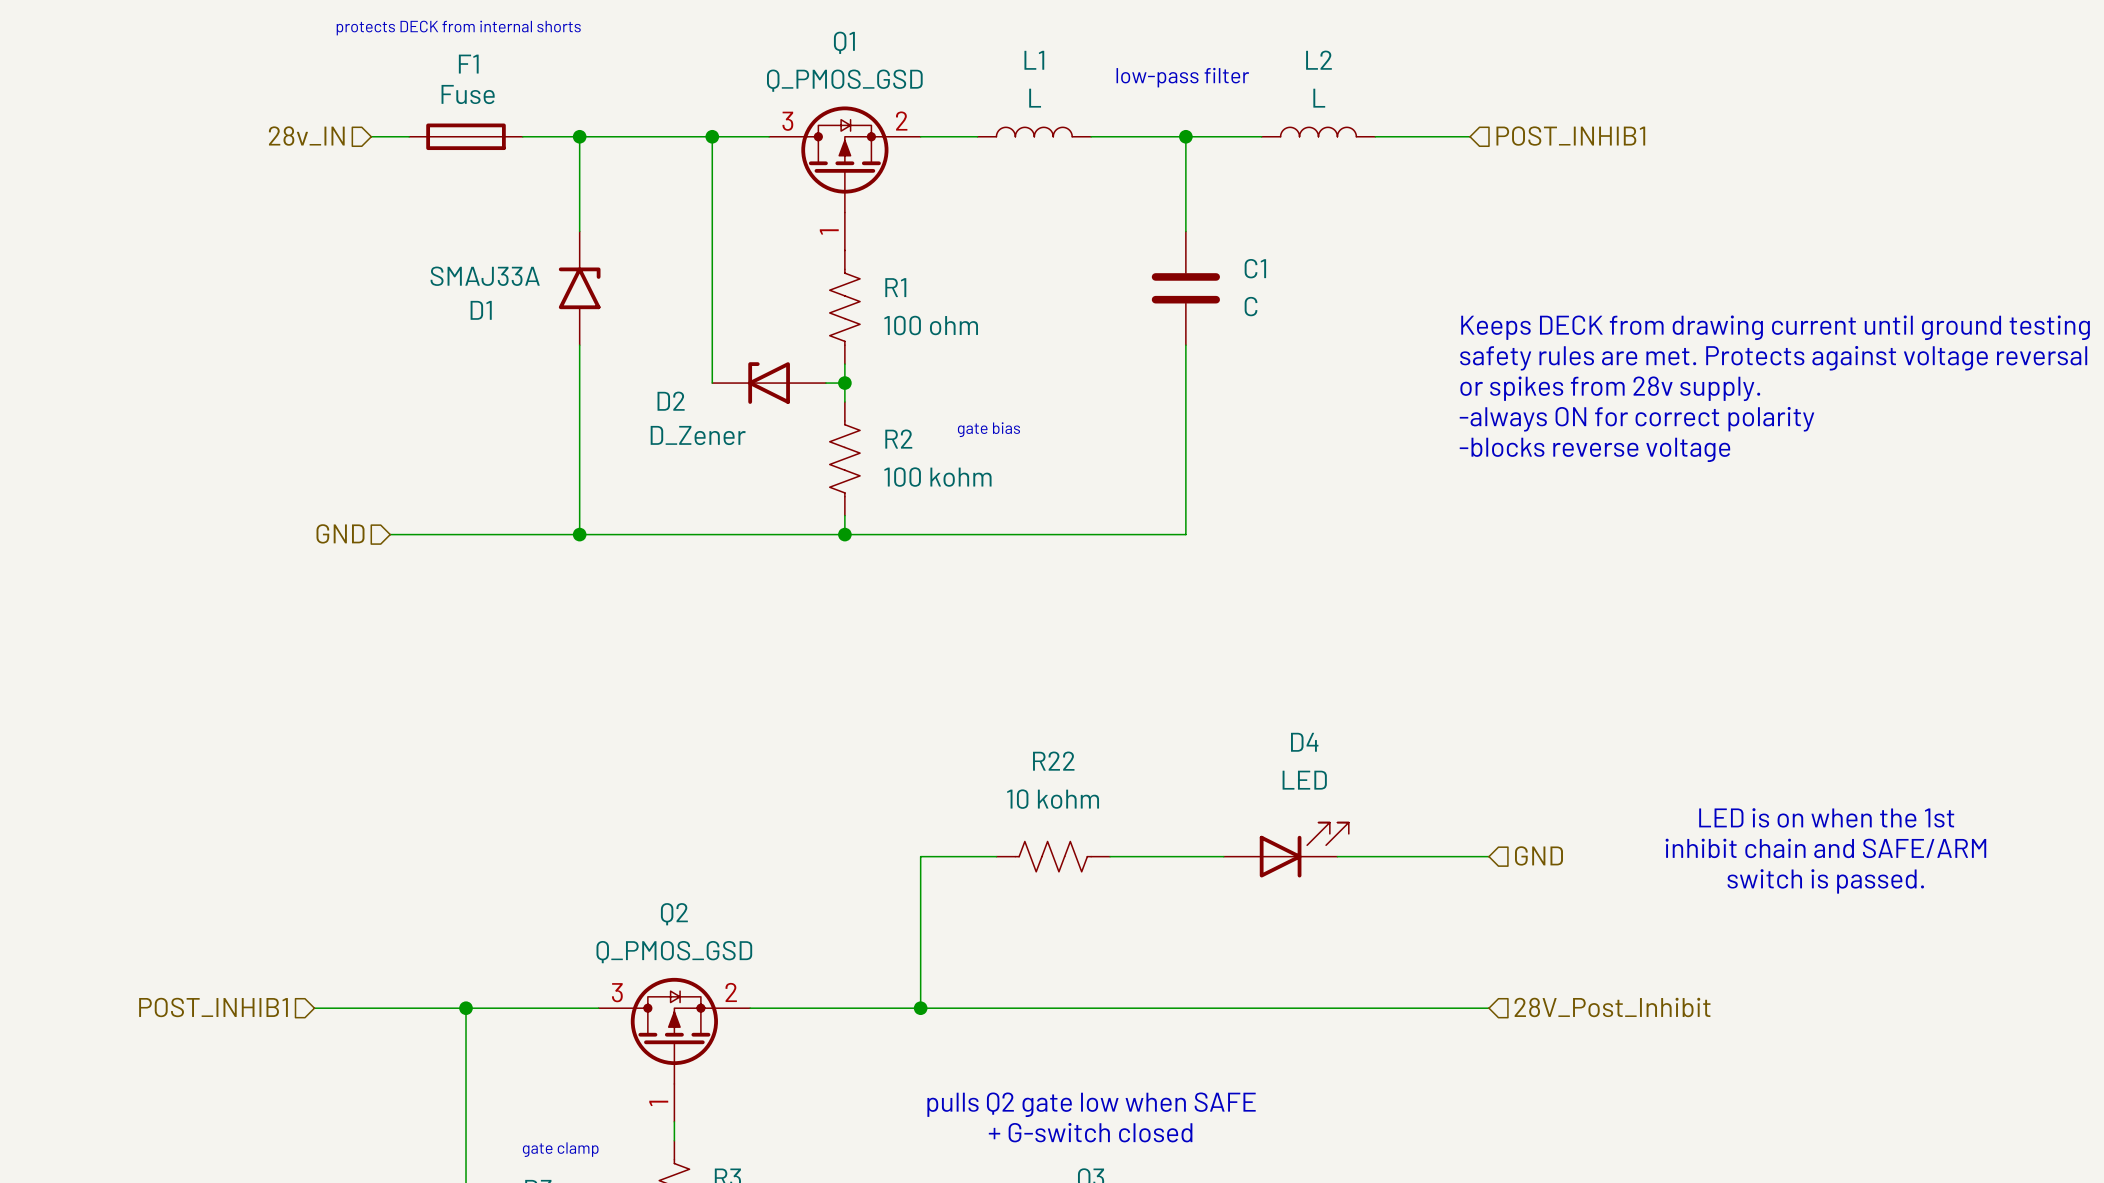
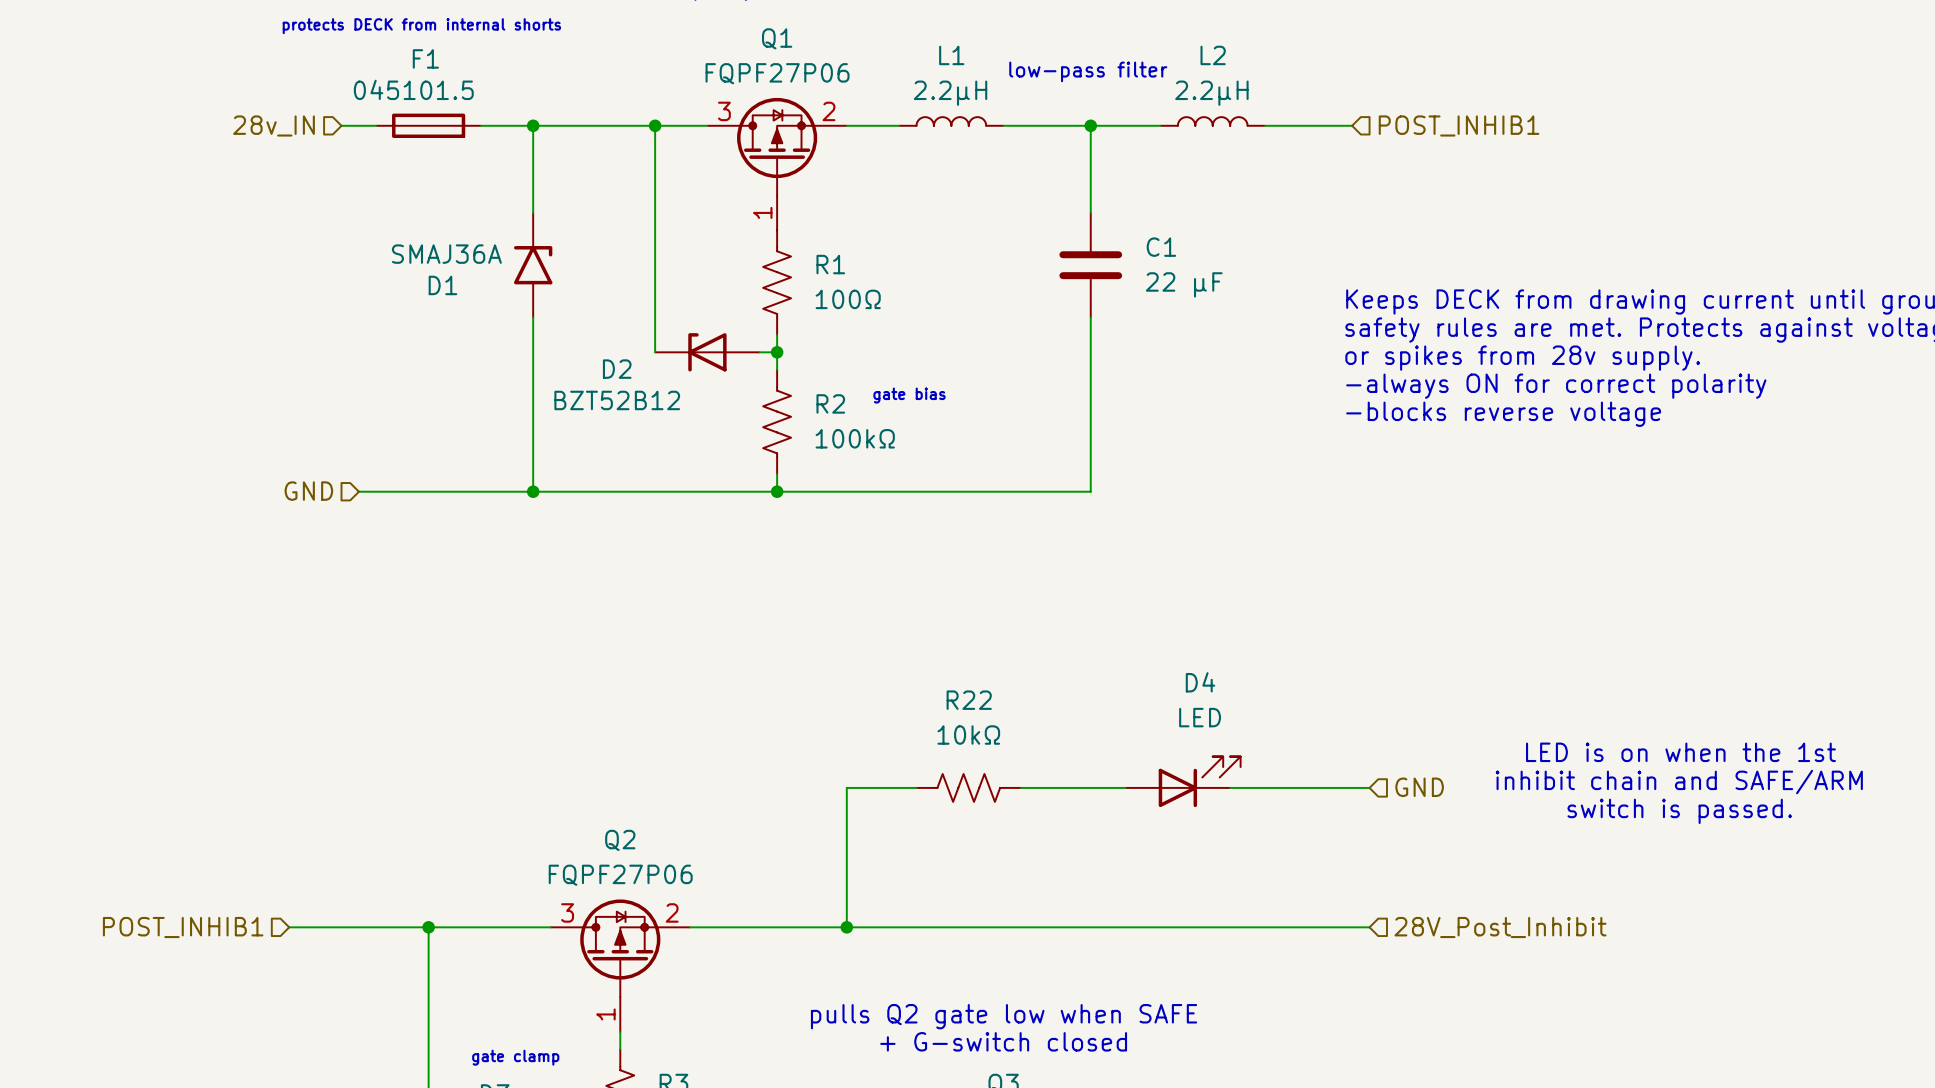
Q1 value: Q_PMOS_GSD (844, 80) -> FQPF27P06 (777, 73)
F1 value: Fuse (468, 94) -> 045101.5 (413, 89)
L1 value: L (1035, 98) -> 2.2µH (950, 93)
L2 value: L (1319, 98) -> 2.2µH (1211, 93)
D1 value: SMAJ33A (485, 276) -> SMAJ36A (446, 254)
C1 value: C (1251, 306) -> 22 µF (1184, 284)
R1 value: 100 ohm (931, 325) -> 100Ω (848, 299)
D2 value: D_Zener (698, 435) -> BZT52B12 (617, 400)
R2 value: 100 kohm (937, 477) -> 100kΩ (855, 438)
R22 value: 10 kohm (1053, 799) -> 10kΩ (968, 735)
Q2 value: Q_PMOS_GSD (674, 952) -> FQPF27P06 (620, 875)

